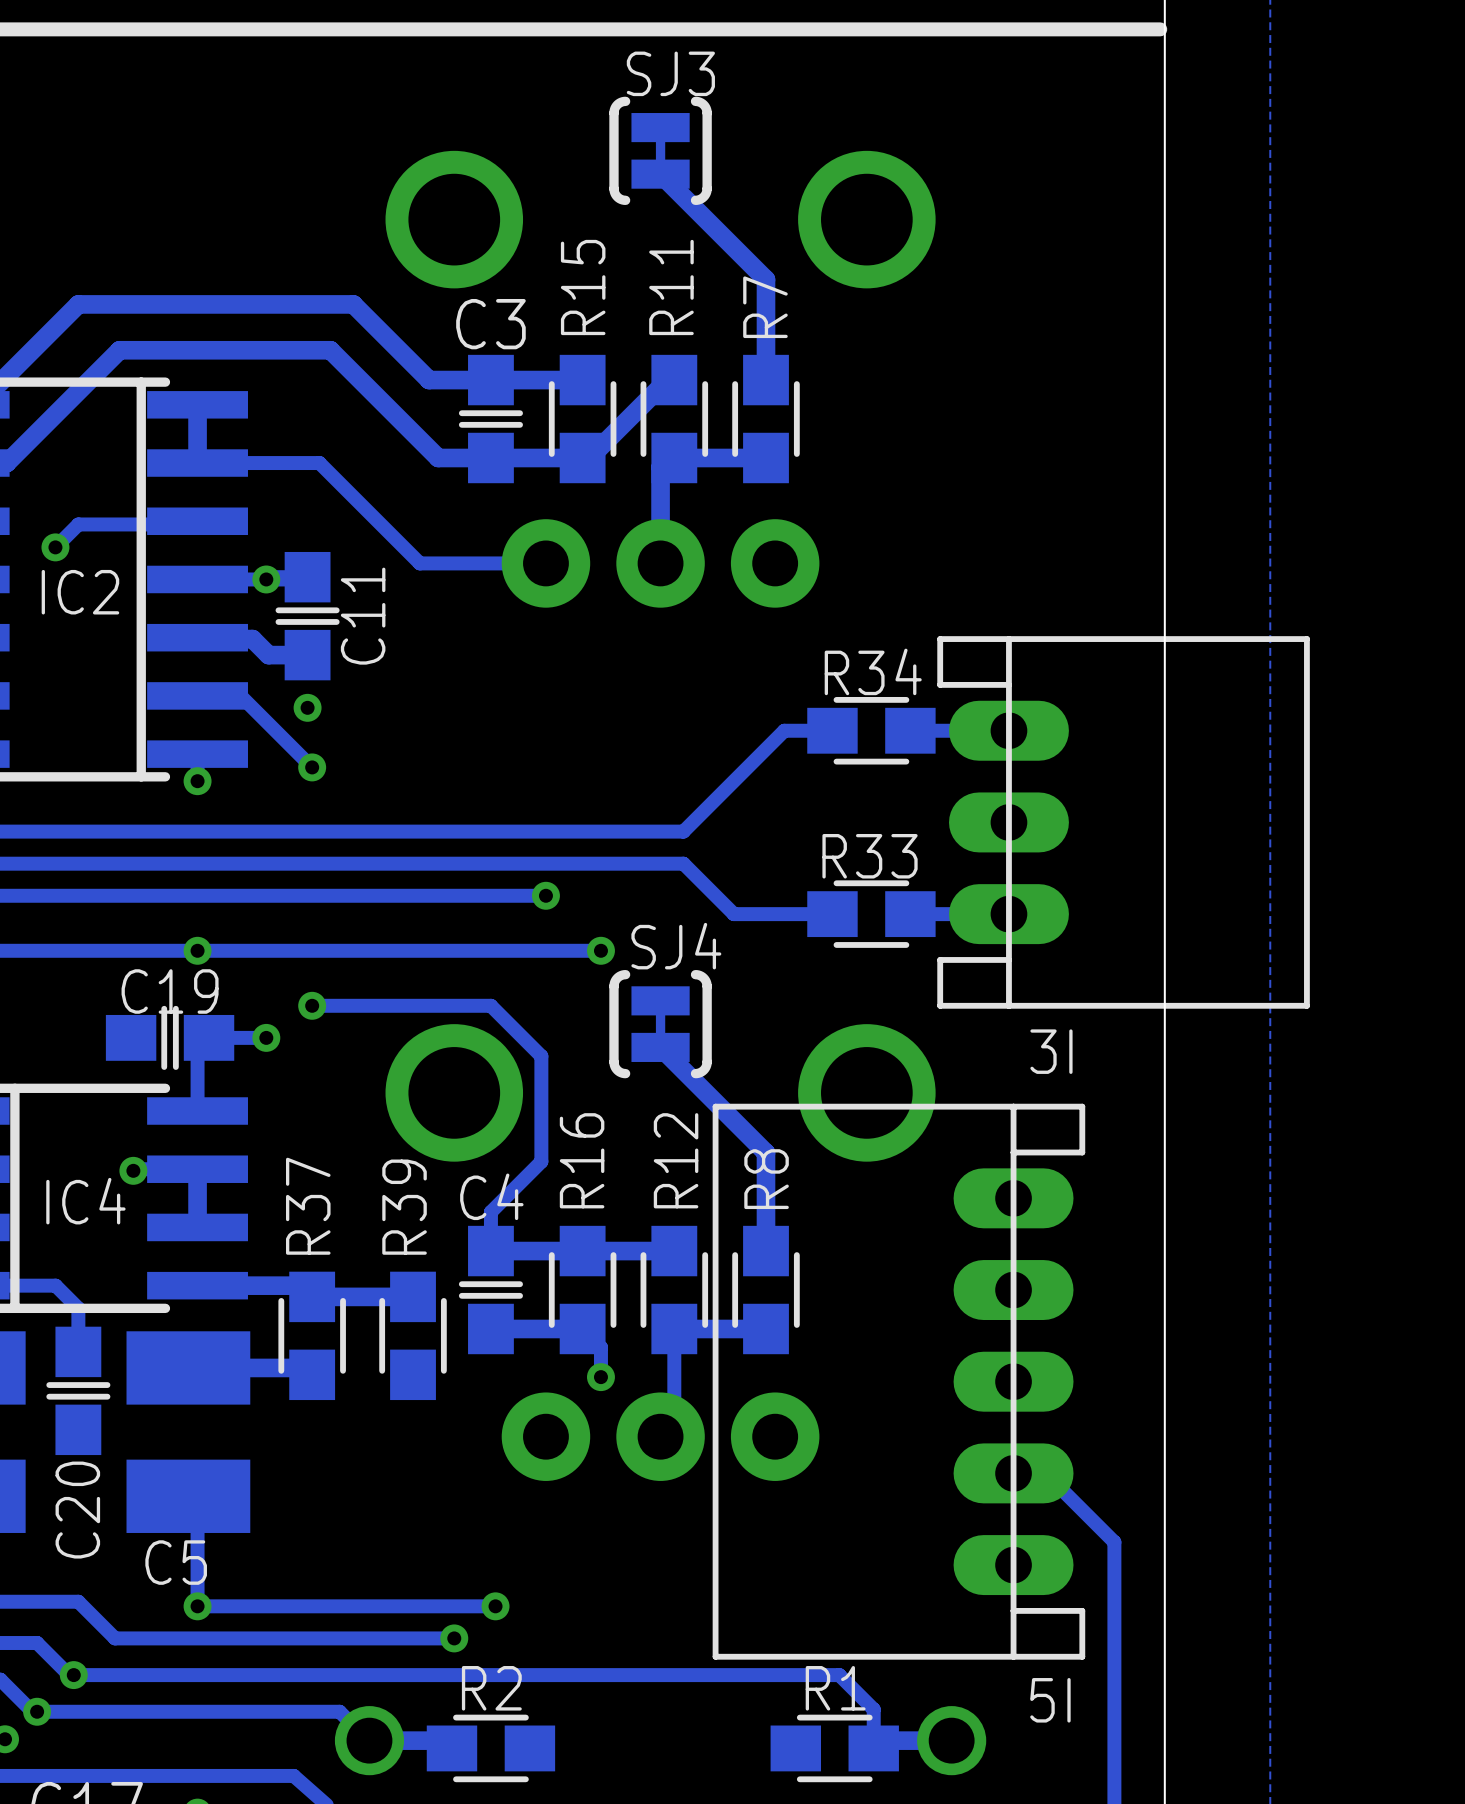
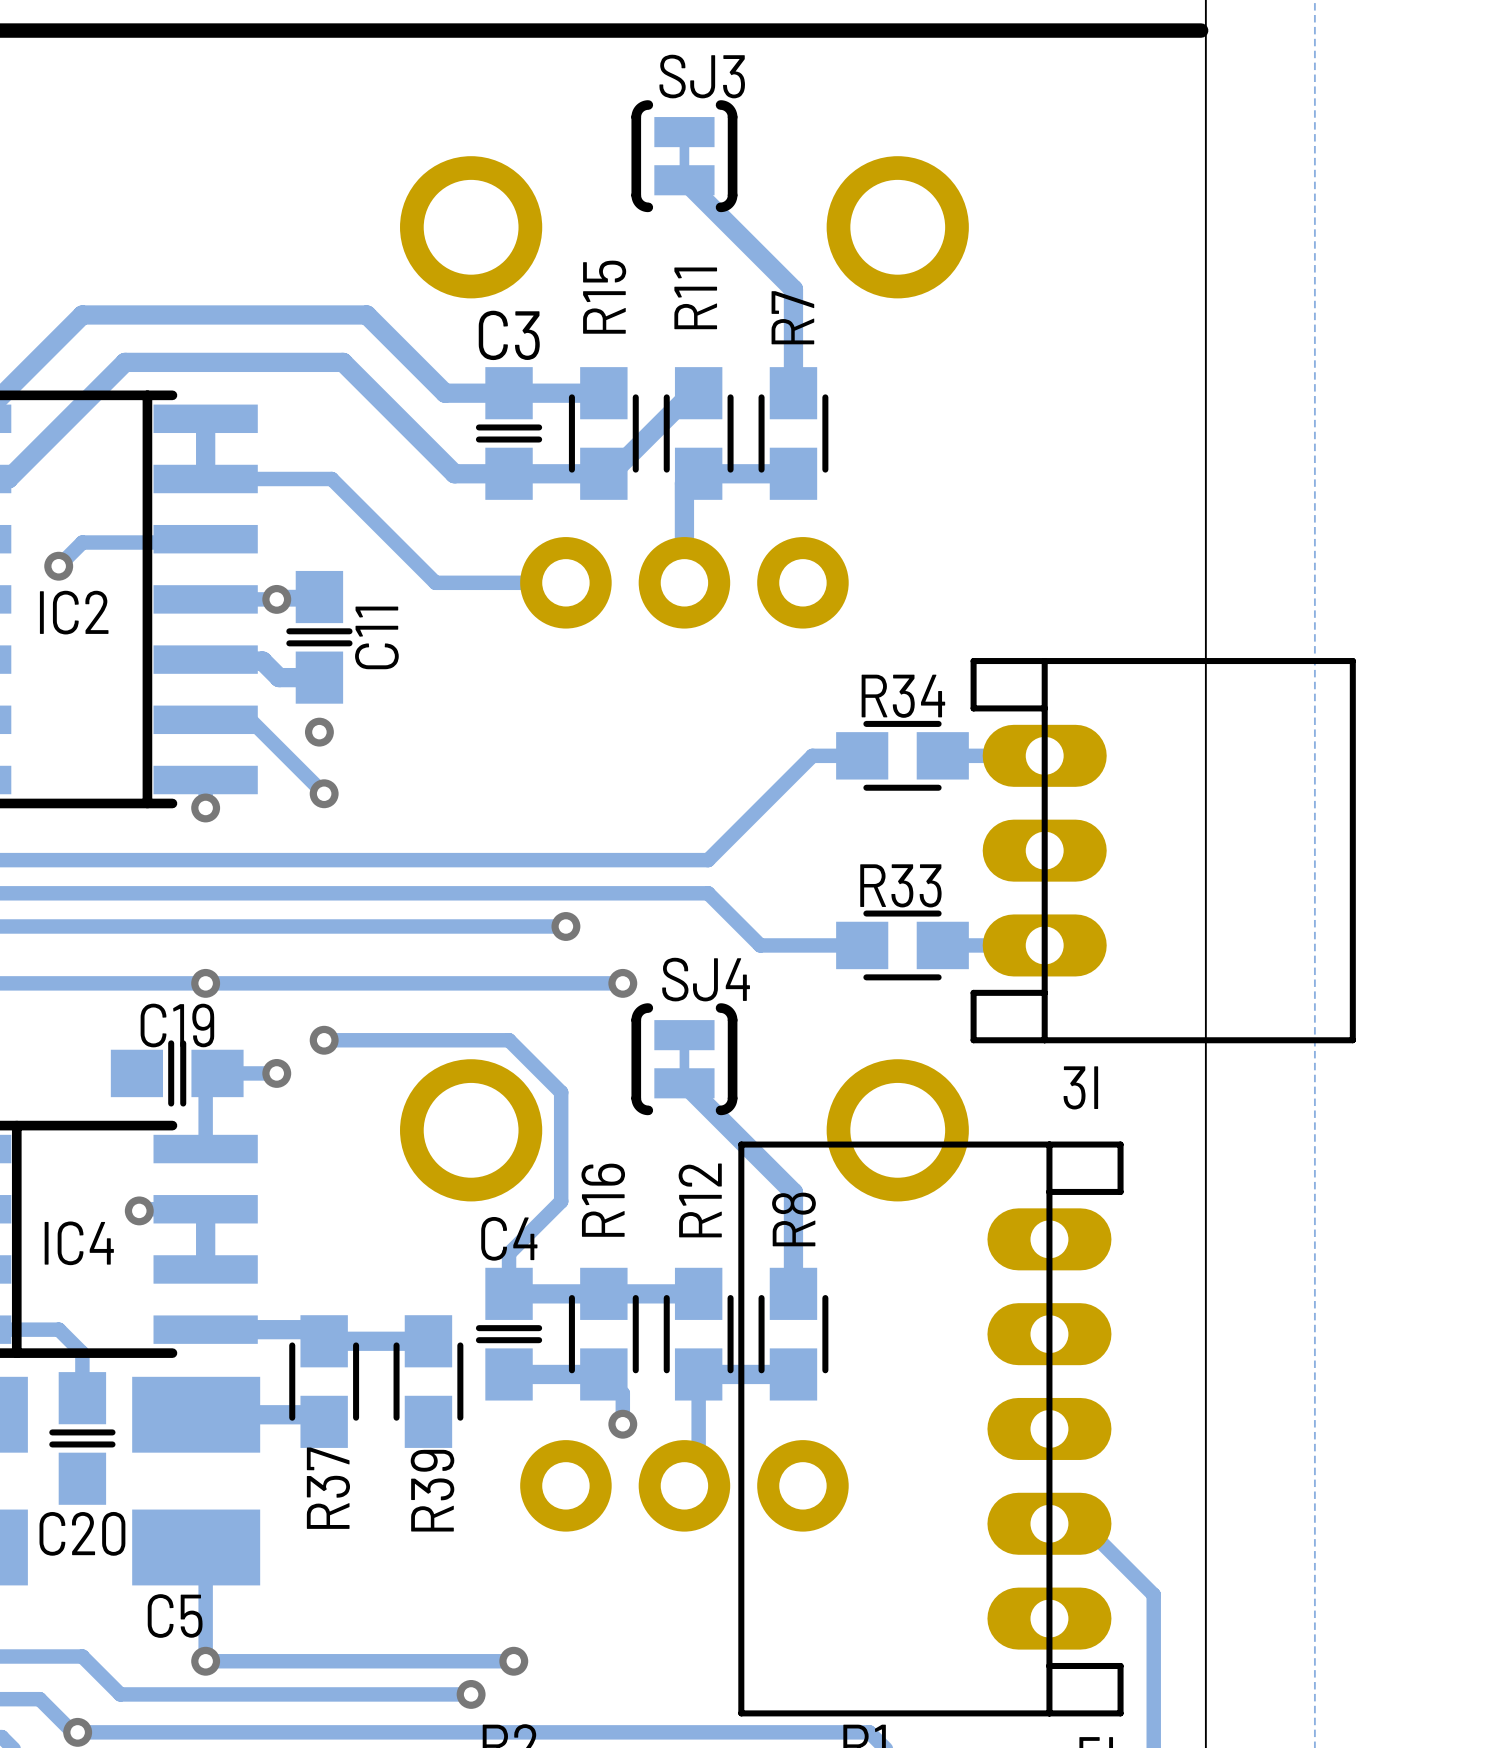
R37 name position: R37 (308, 1206) -> R37 (328, 1488)
R39 name position: R39 (404, 1207) -> R39 (432, 1490)
C20 name rotation: 0° (77, 1510) -> 90° clockwise (82, 1533)

